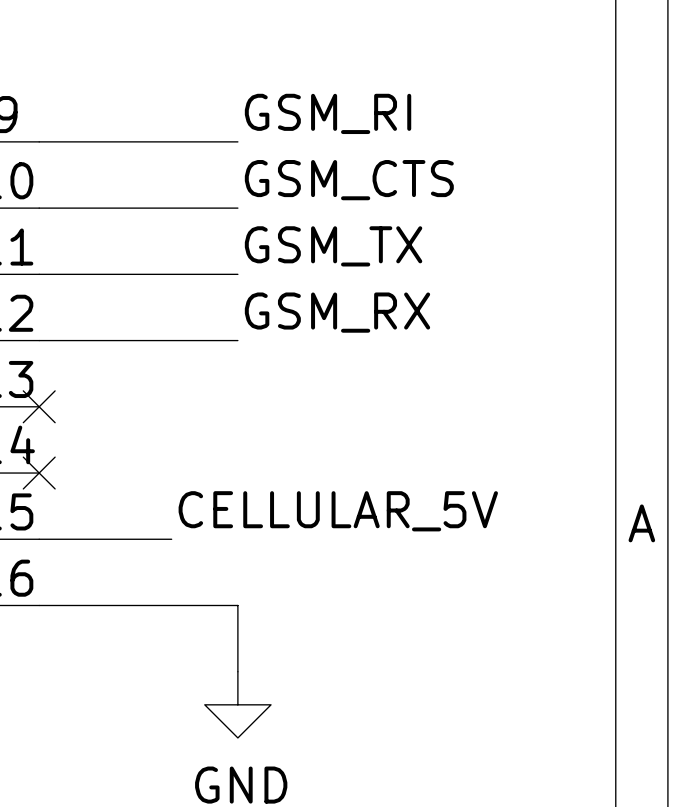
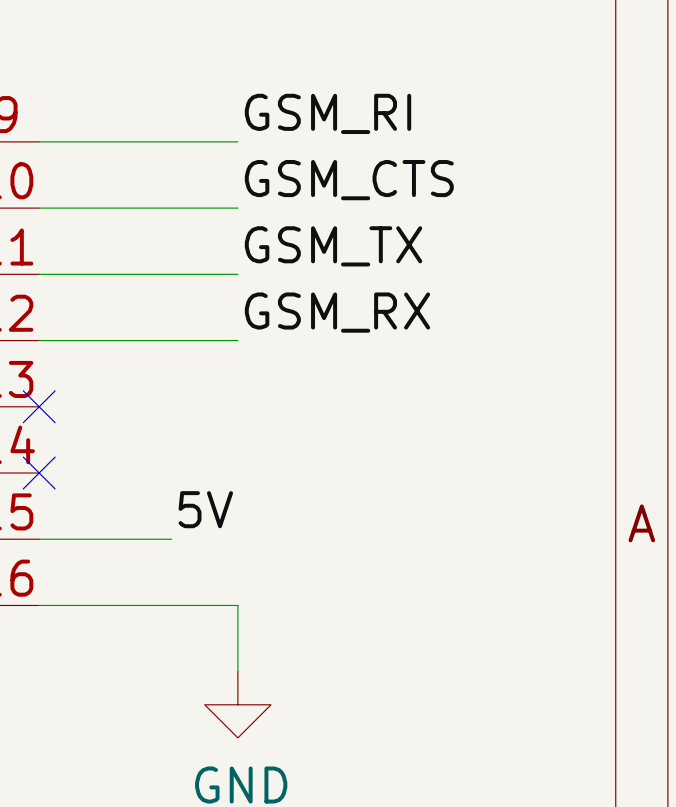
label: CELLULAR_5V (338, 511) -> 5V (205, 509)

